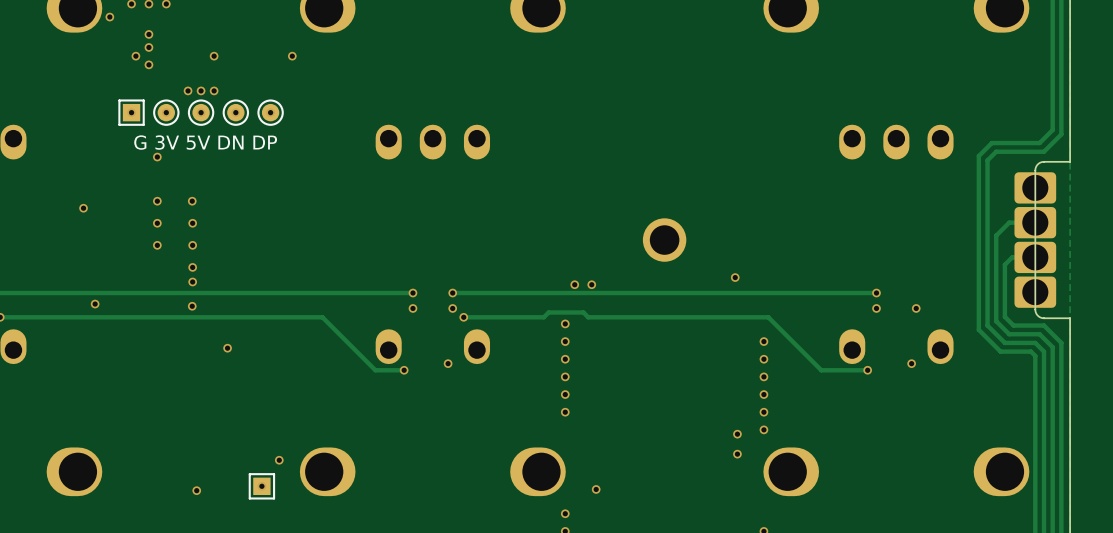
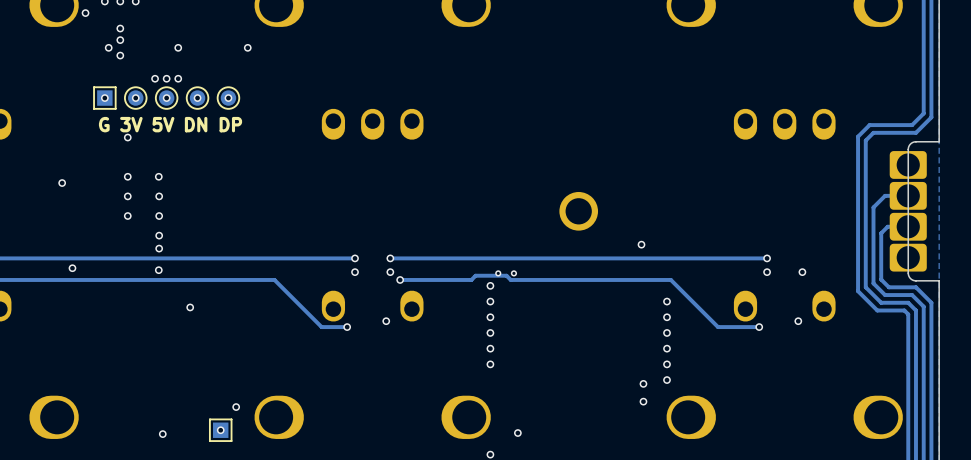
via: (574, 284) -> none
via: (591, 284) -> none
via: none -> (498, 273)
via: none -> (513, 273)

